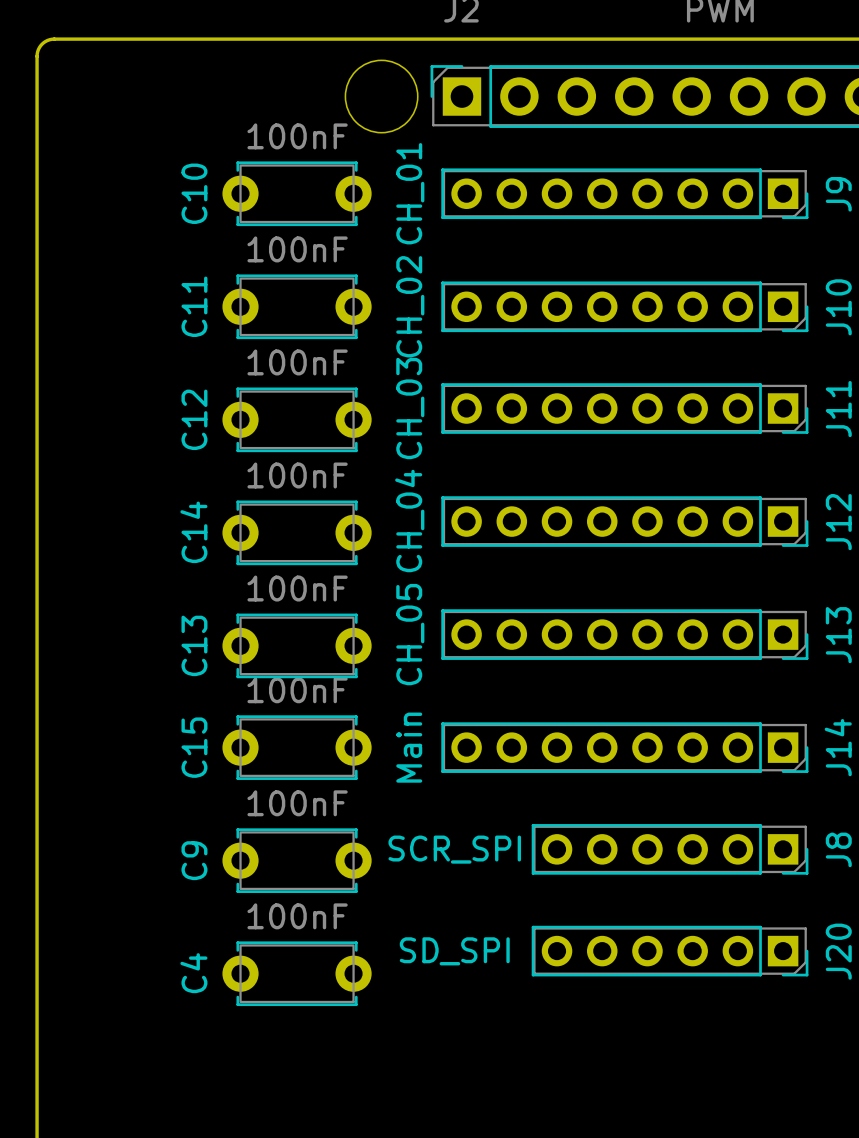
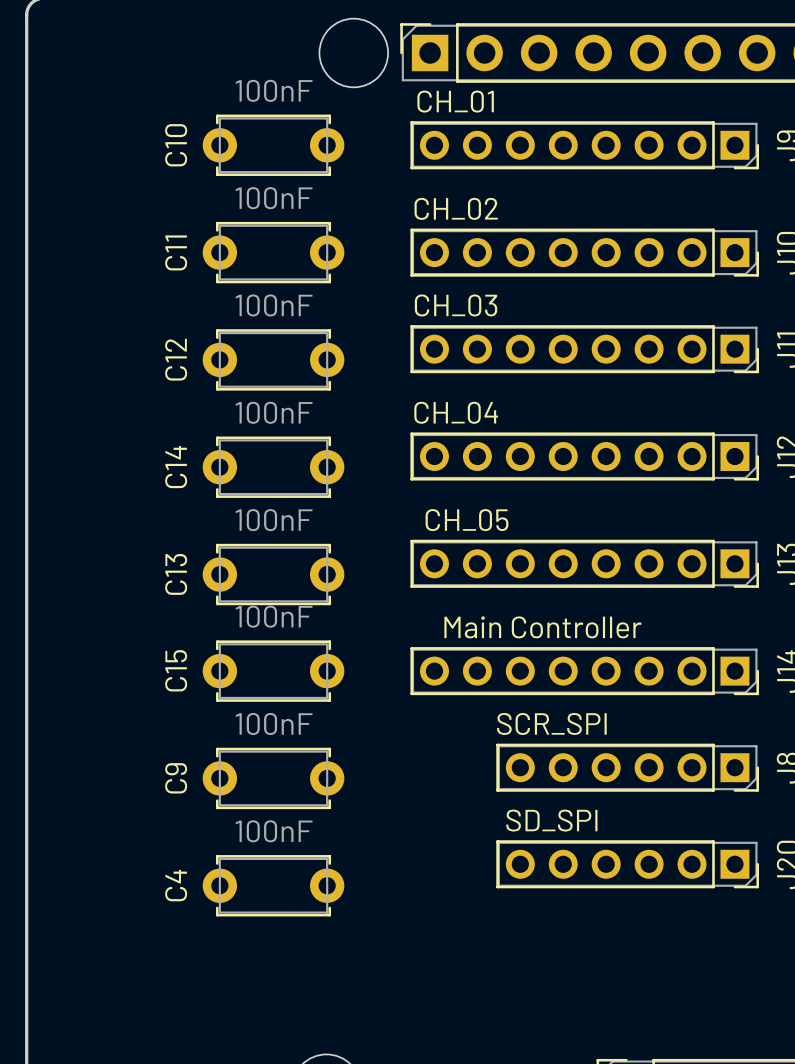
J9 value rotation: 0° (410, 193) -> 90° clockwise (455, 101)
J10 value rotation: 0° (410, 306) -> 90° clockwise (456, 208)
J11 value rotation: 0° (410, 408) -> 90° clockwise (456, 305)
J12 value rotation: 0° (409, 521) -> 90° clockwise (456, 412)
J13 value rotation: 0° (410, 634) -> 90° clockwise (467, 520)
J14 value: Main (409, 747) -> Main Controller (543, 627)
J8 value position: SCR_SPI (454, 849) -> SCR_SPI (551, 723)
J20 value position: SD_SPI (454, 951) -> SD_SPI (551, 820)

